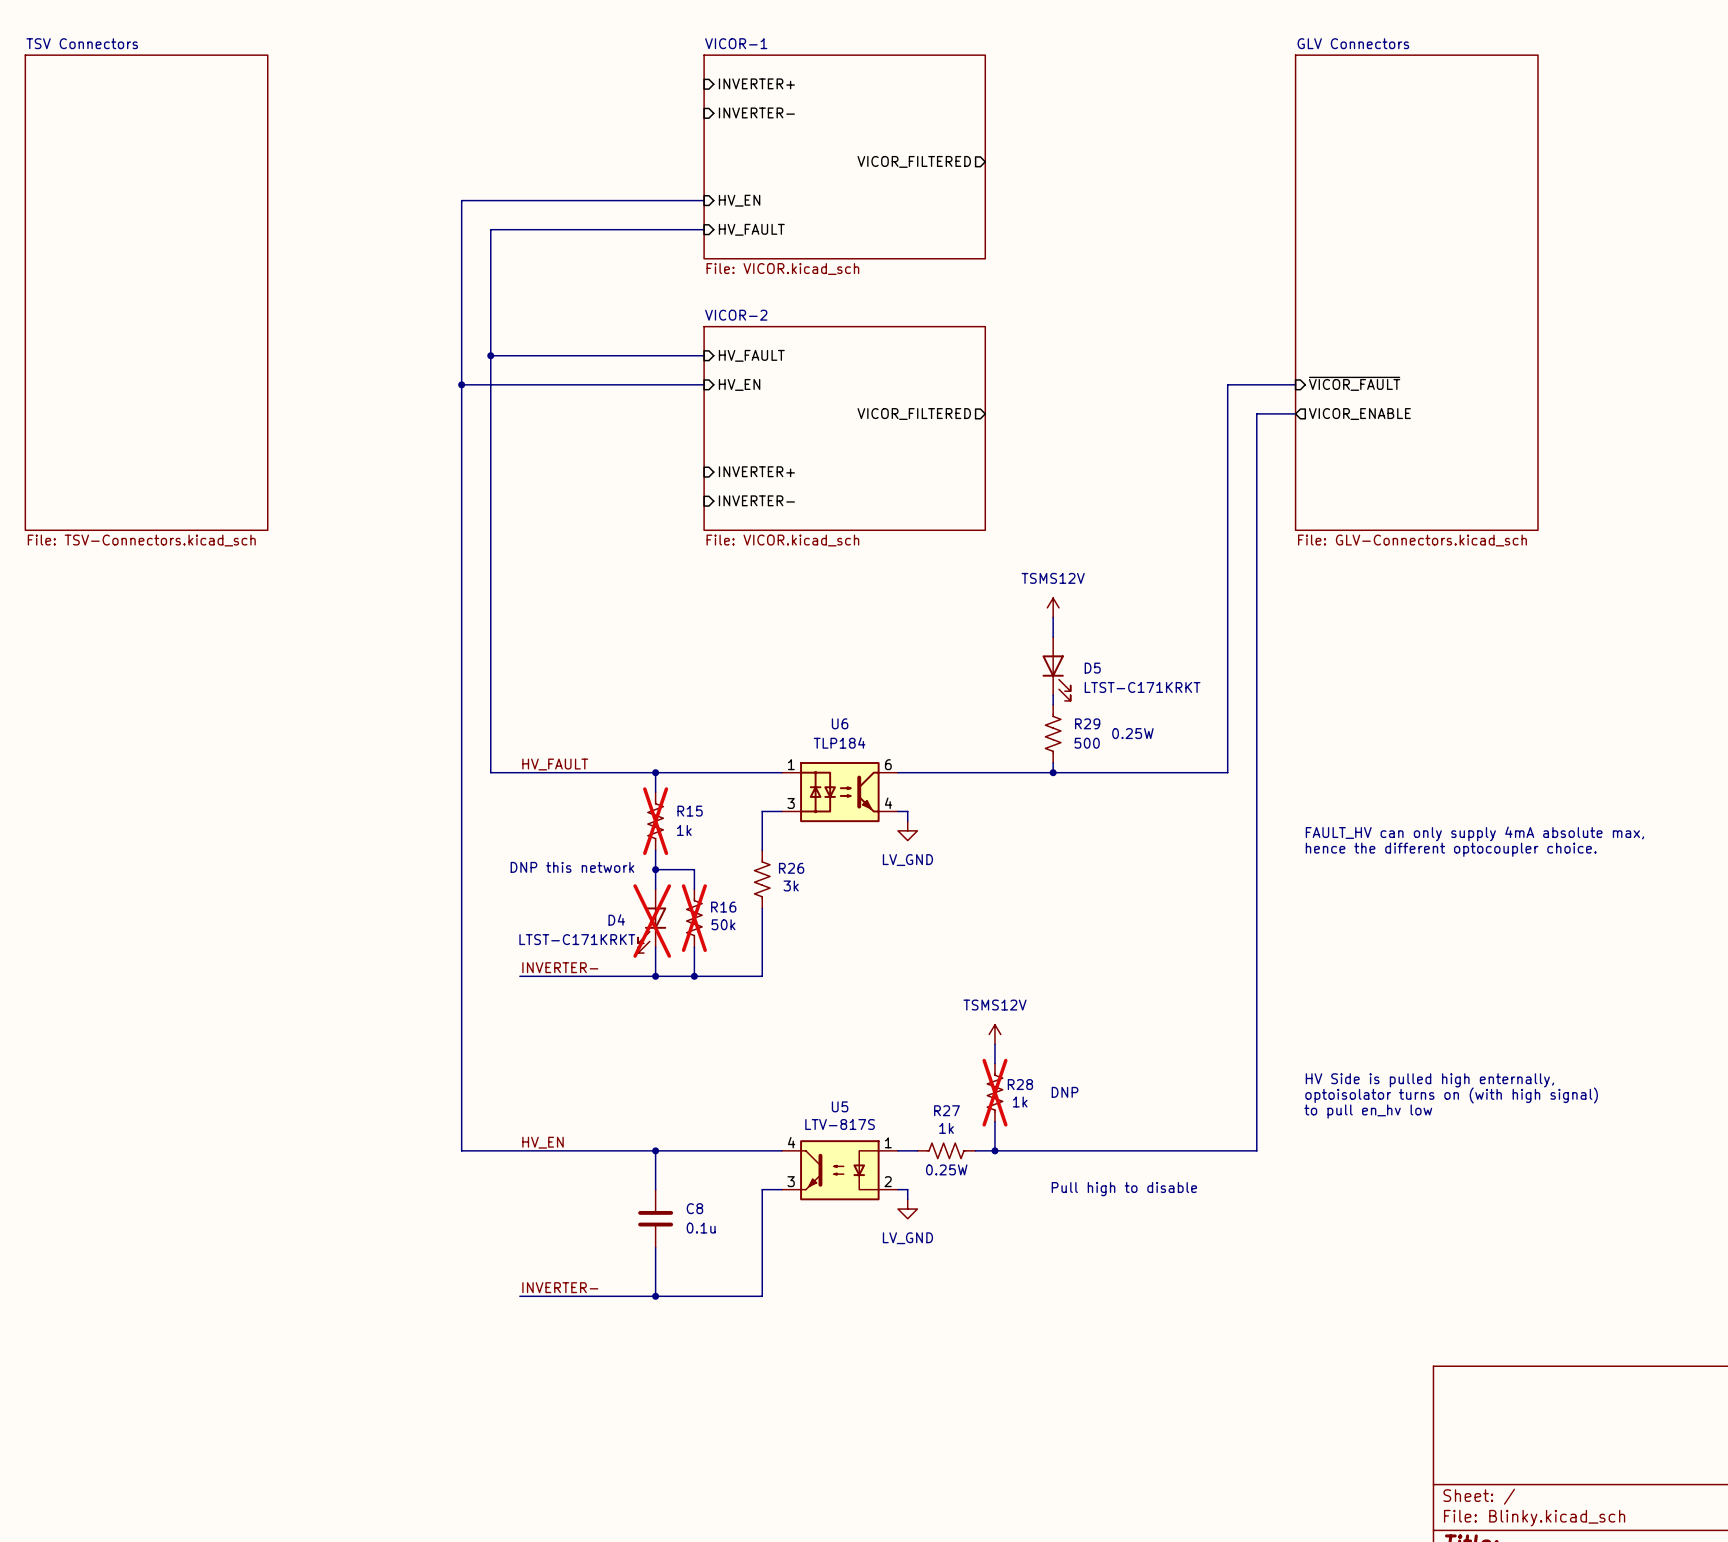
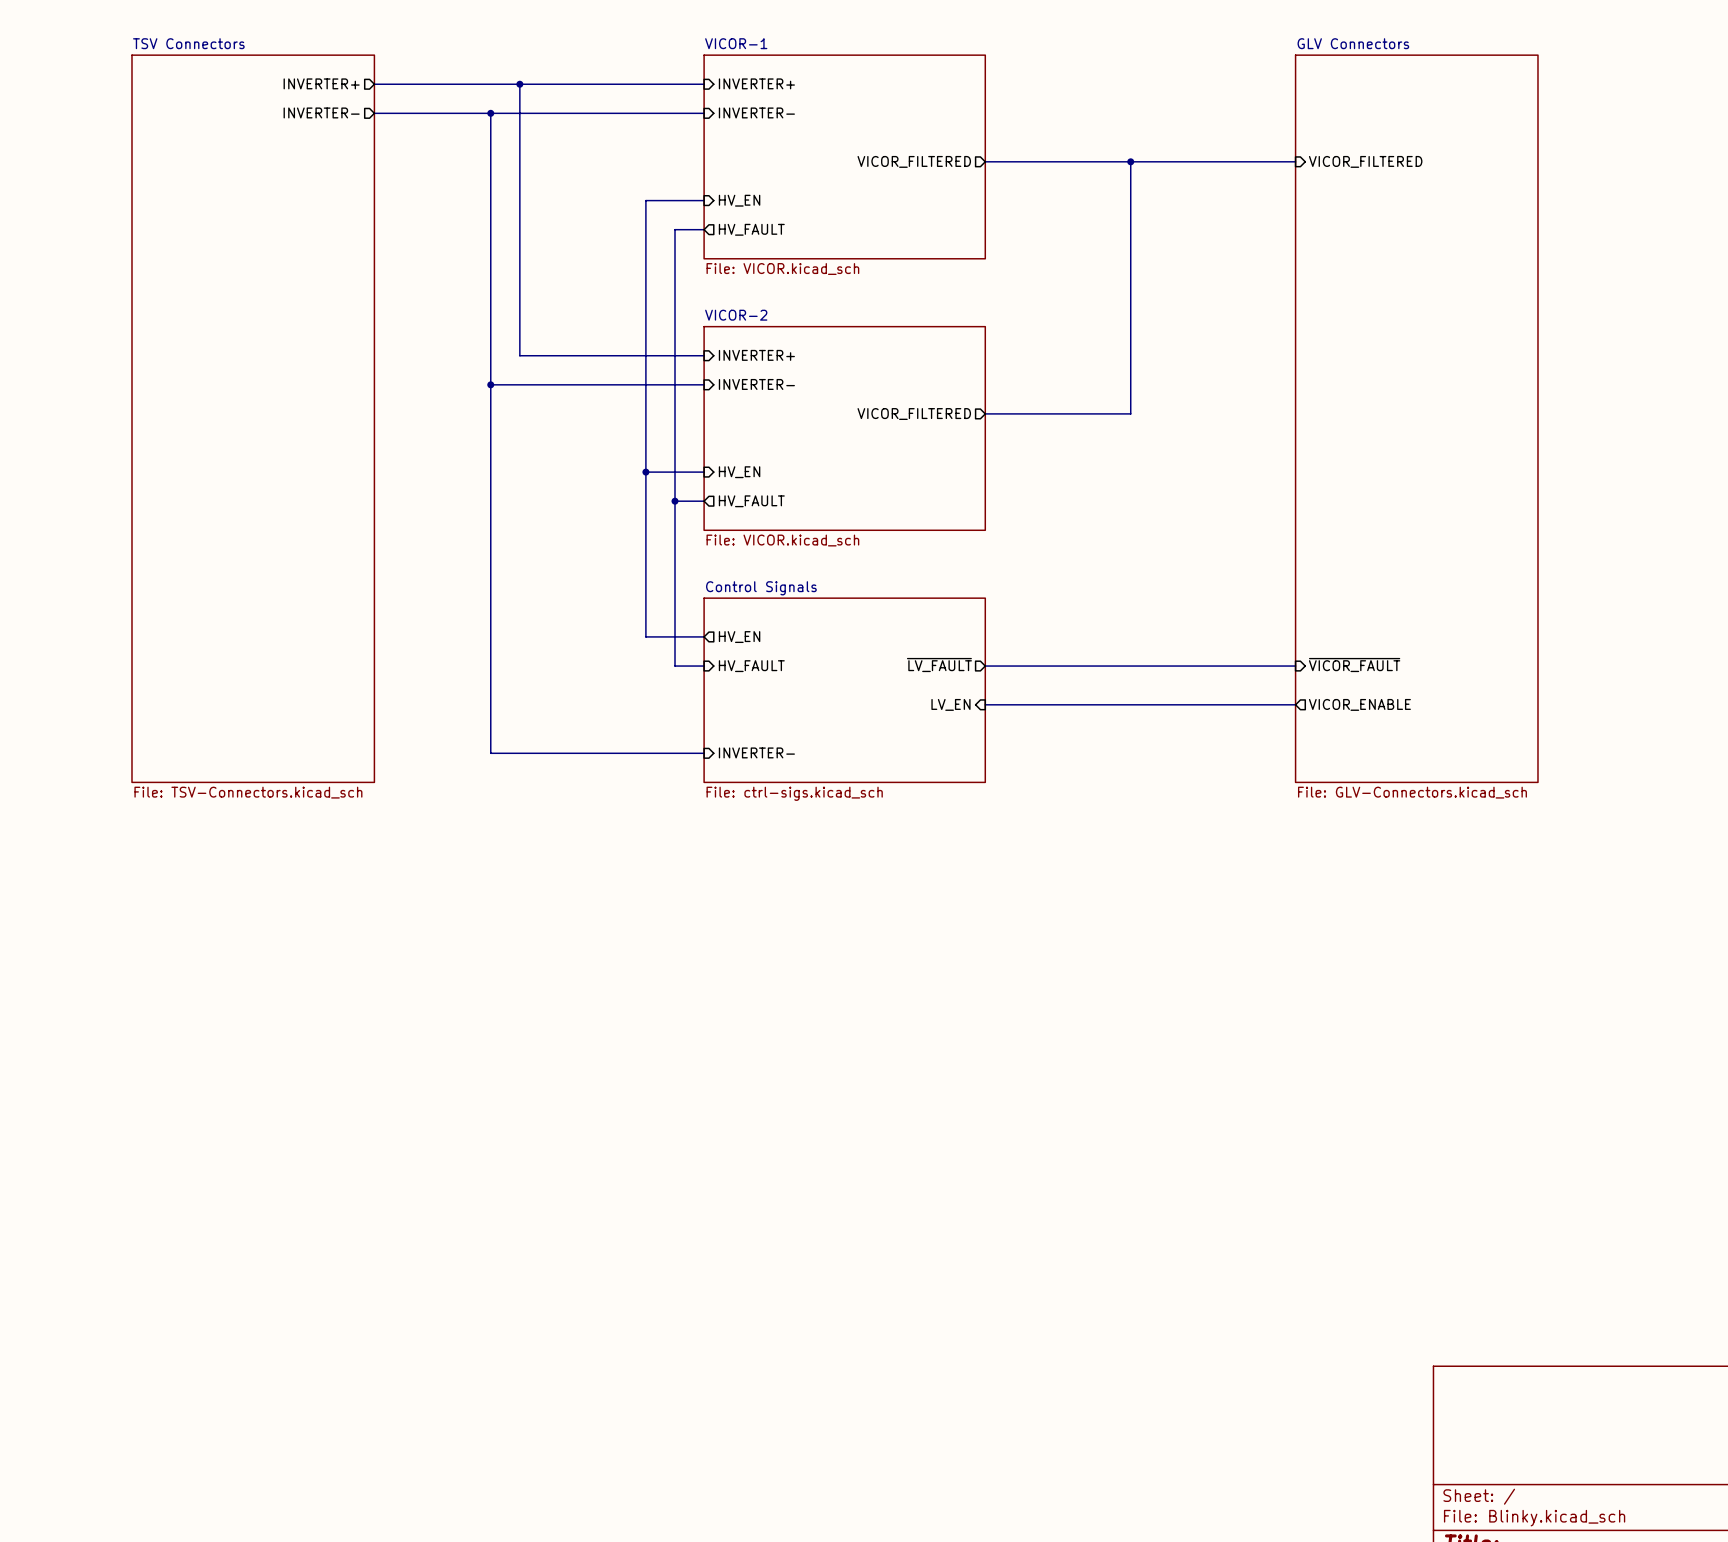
sheet pin: none -> INVERTER+ (321, 83)
wire: none -> (374, 84) (704, 84)
junction: none -> (519, 84)
sheet pin: none -> INVERTER- (321, 112)
wire: none -> (374, 113) (704, 113)
junction: none -> (490, 113)
wire: none -> (985, 161) (1295, 161)
wire: none -> (1130, 161) (1130, 413) (985, 413)
junction: none -> (1130, 161)
sheet pin: none -> VICOR_FILTERED (1365, 161)
wire: (645, 200) (461, 200) (461, 1150) (781, 1150) -> (645, 200) (645, 636) (704, 636)
wire: (490, 229) (675, 229) -> (490, 229) (490, 113)
wire: none -> (675, 229) (675, 666) (704, 666)
sheet pin shape: input (751, 229) -> output (751, 229)
sheet TSV Connectors: File: TSV-Connectors.kicad_sch (146, 292) -> none
sheet GLV Connectors: File: GLV-Connectors.kicad_sch (1416, 292) -> none
wire: (490, 355) (519, 355) -> (519, 84) (519, 355)
junction: (490, 355) -> none
sheet pin: HV_FAULT (751, 355) -> INVERTER+ (756, 355)
sheet pin: ~{VICOR_FAULT} (1354, 383) -> none
wire: (461, 384) (490, 384) -> none
junction: (461, 384) -> none
junction: none -> (490, 384)
sheet pin: HV_EN (739, 384) -> INVERTER- (756, 384)
wire: (1295, 384) (1227, 384) (1227, 772) (898, 772) -> none
wire: (1295, 413) (1256, 413) (1256, 1150) (975, 1150) -> none
sheet pin: VICOR_ENABLE (1359, 414) -> none
sheet TSV Connectors: none -> File: TSV-Connectors.kicad_sch (253, 418)
sheet GLV Connectors: none -> File: GLV-Connectors.kicad_sch (1416, 418)
sheet pin: INVERTER+ (756, 471) -> HV_EN (739, 472)
wire: none -> (645, 472) (704, 472)
junction: none -> (645, 472)
sheet pin shape: input (756, 500) -> output (751, 501)
sheet pin: INVERTER- (756, 500) -> HV_FAULT (751, 501)
wire: none -> (675, 501) (704, 501)
junction: none -> (675, 501)
power symbol: TSMS12V (1053, 607) -> none
wire: (1053, 617) (1053, 636) -> none
sheet pin: none -> HV_EN (739, 637)
sheet pin: none -> ~{LV_FAULT} (939, 665)
sheet pin: none -> ~{VICOR_FAULT} (1354, 665)
sheet pin: none -> HV_FAULT (751, 666)
wire: none -> (985, 666) (1295, 666)
D5: LTST-C171KRKT (1056, 668) -> none
sheet Control Signals: none -> File: ctrl-sigs.kicad_sch (844, 690)
wire: (1053, 695) (1053, 704) -> none
sheet pin: none -> LV_EN (950, 704)
wire: none -> (985, 704) (1295, 704)
sheet pin: none -> VICOR_ENABLE (1359, 704)
R29: 500 (1053, 733) -> none
text: 0.25W (1132, 733) -> none
sheet pin: none -> INVERTER- (756, 752)
wire: (490, 753) (490, 772) (781, 772) -> (490, 753) (704, 753)
wire: (1053, 762) (1053, 772) -> none
label: HV_FAULT (555, 764) -> none
wire: (655, 772) (655, 792) -> none
junction: (655, 772) -> none
junction: (1053, 772) -> none
U6: TLP184 (839, 792) -> none
wire: (781, 811) (762, 811) (762, 850) -> none
wire: (898, 811) (907, 811) (907, 821) -> none
R15: 1k (655, 821) -> none
power symbol: LV_GND (907, 830) -> none
text: FAULT_HV can only supply 4mA absolute max, (1474, 833) -> none
text: hence the different optocoupler choice. (1451, 849) -> none
wire: (655, 850) (655, 889) -> none
text: DNP this network (572, 867) -> none
wire: (655, 869) (694, 869) (694, 889) -> none
junction: (655, 869) -> none
R26: 3k (762, 879) -> none
wire: (762, 908) (762, 976) (519, 976) -> none
R16: 50k (694, 918) -> none
D4: LTST-C171KRKT (652, 921) -> none
wire: (655, 947) (655, 976) -> none
wire: (694, 947) (694, 976) -> none
label: INVERTER- (560, 967) -> none
junction: (655, 976) -> none
junction: (694, 976) -> none
power symbol: TSMS12V (994, 1034) -> none
wire: (994, 1044) (994, 1063) -> none
text: HV Side is pulled high enternally, (1429, 1080) -> none
R28: 1k (994, 1092) -> none
text: DNP (1065, 1092) -> none
text: optoisolator turns on (with high signal) (1451, 1095) -> none
text: to pull en_hv low (1368, 1111) -> none
wire: (994, 1121) (994, 1150) -> none
label: HV_EN (543, 1142) -> none
wire: (655, 1150) (655, 1189) -> none
junction: (655, 1150) -> none
wire: (898, 1150) (917, 1150) -> none
R27: 1k (946, 1150) -> none
junction: (994, 1150) -> none
text: 0.25W (946, 1169) -> none
U5: LTV-817S (839, 1170) -> none
wire: (781, 1189) (762, 1189) (762, 1296) (519, 1296) -> none
wire: (898, 1189) (907, 1189) (907, 1199) -> none
text: Pull high to disable (1124, 1189) -> none
power symbol: LV_GND (907, 1209) -> none
C8: 0.1u (655, 1218) -> none
wire: (655, 1247) (655, 1296) -> none
label: INVERTER- (560, 1287) -> none
junction: (655, 1296) -> none

